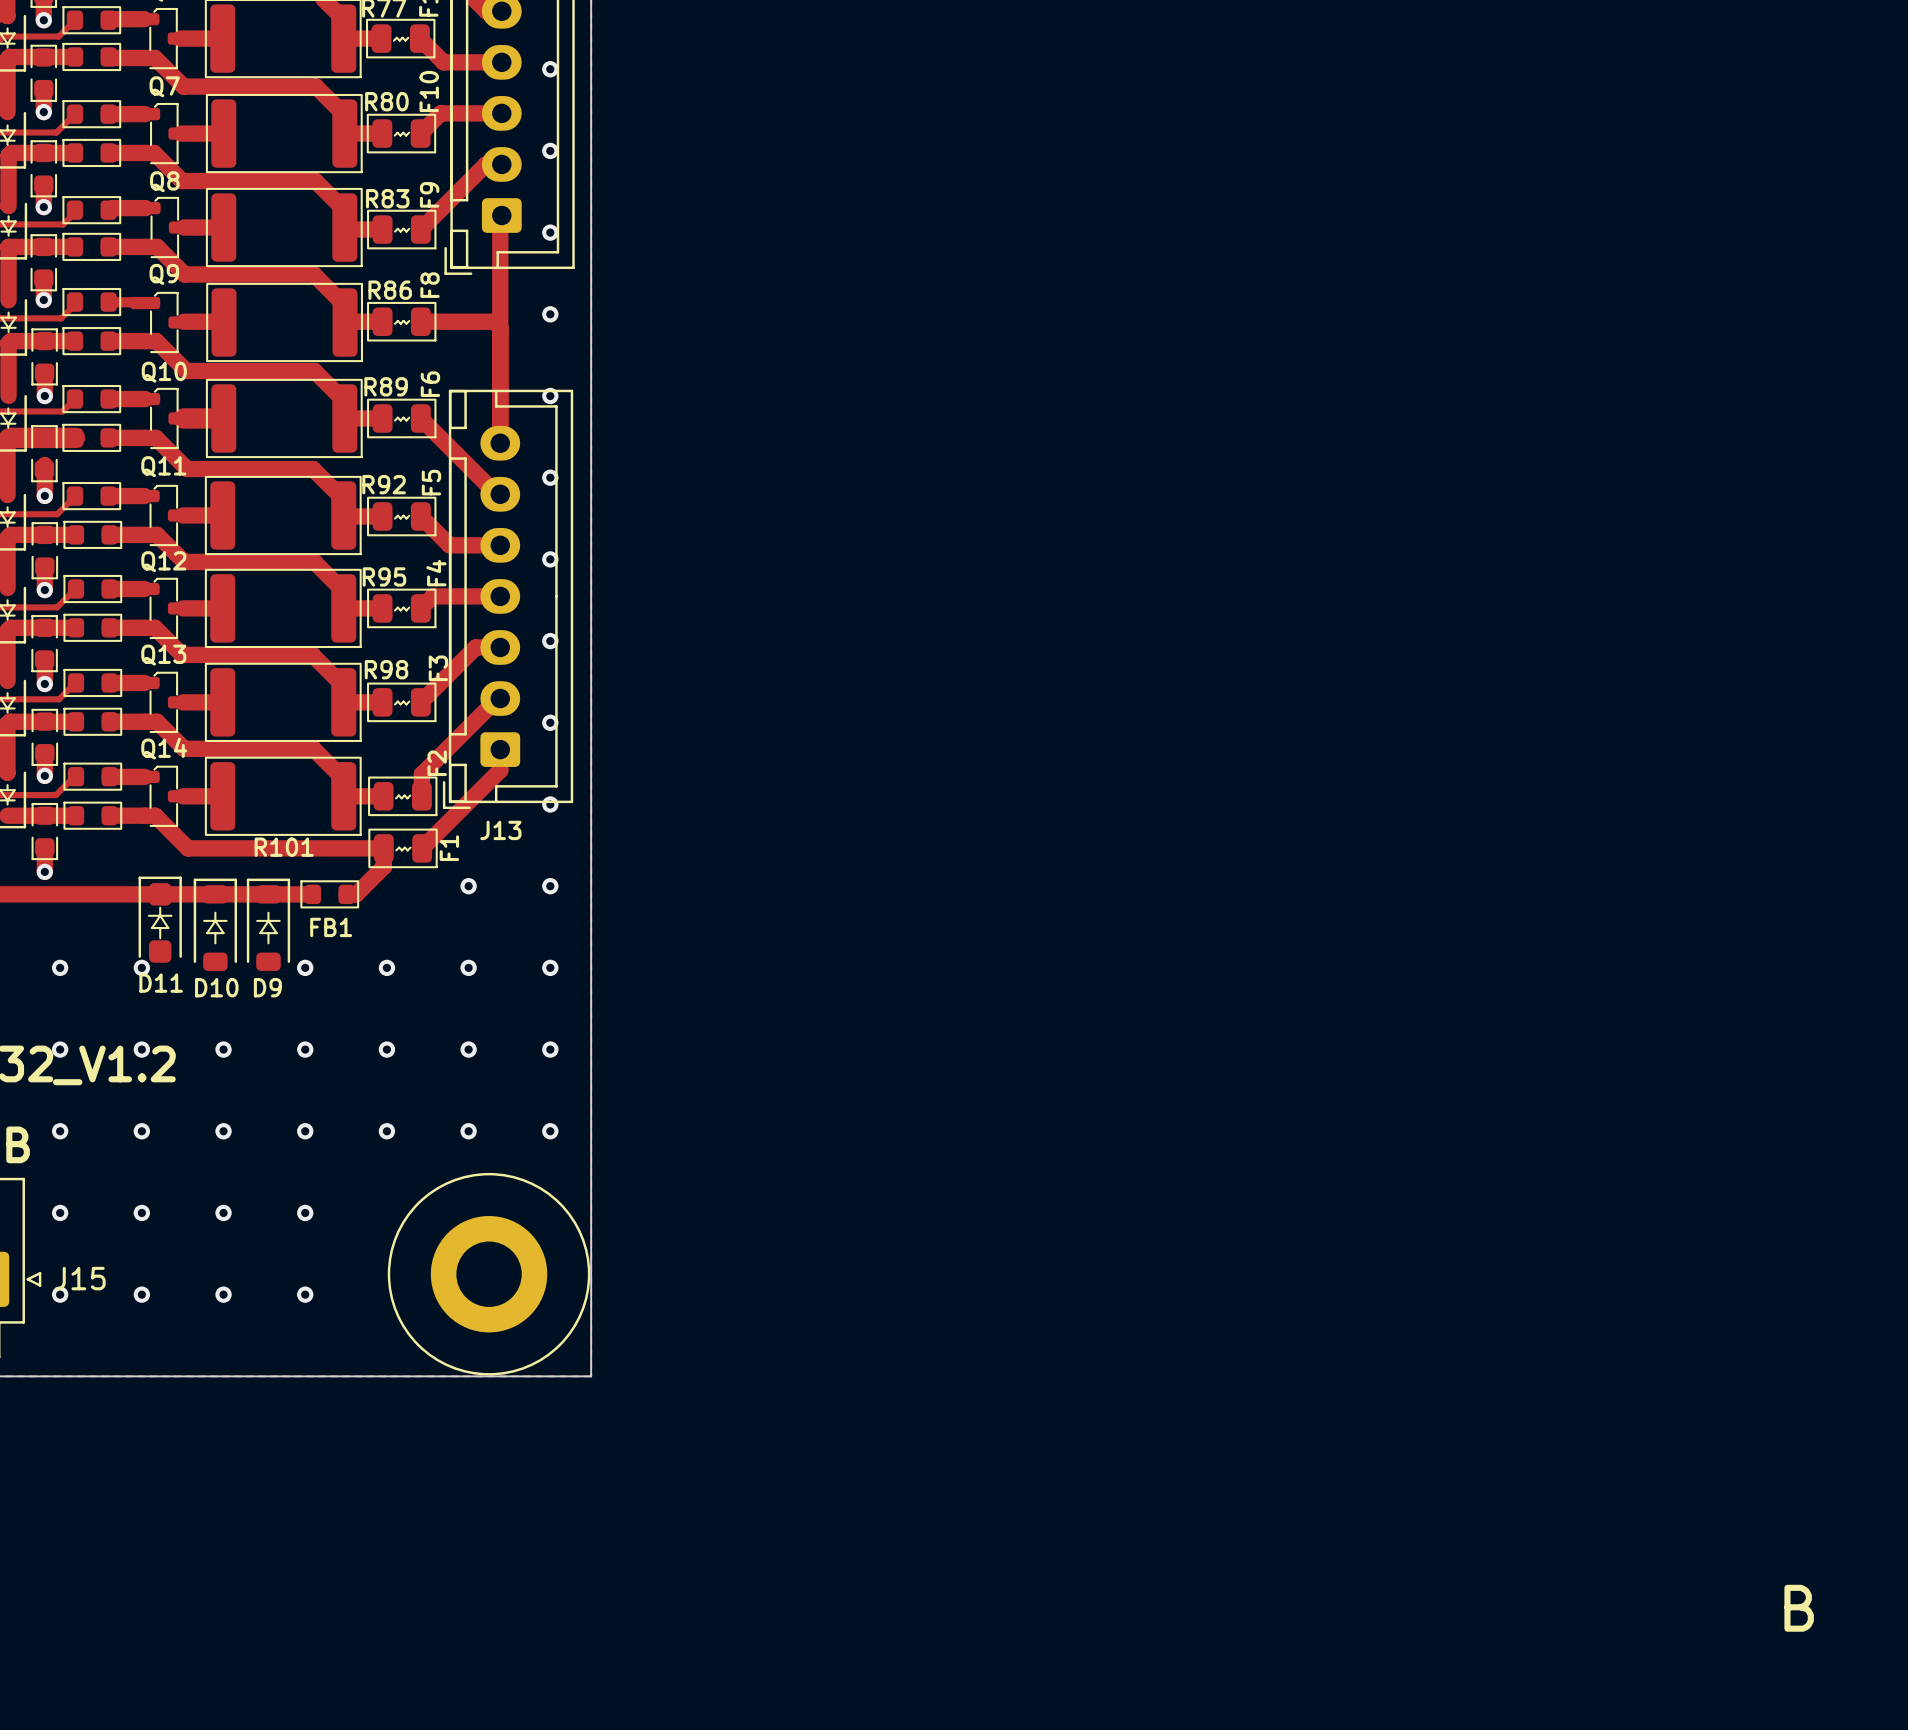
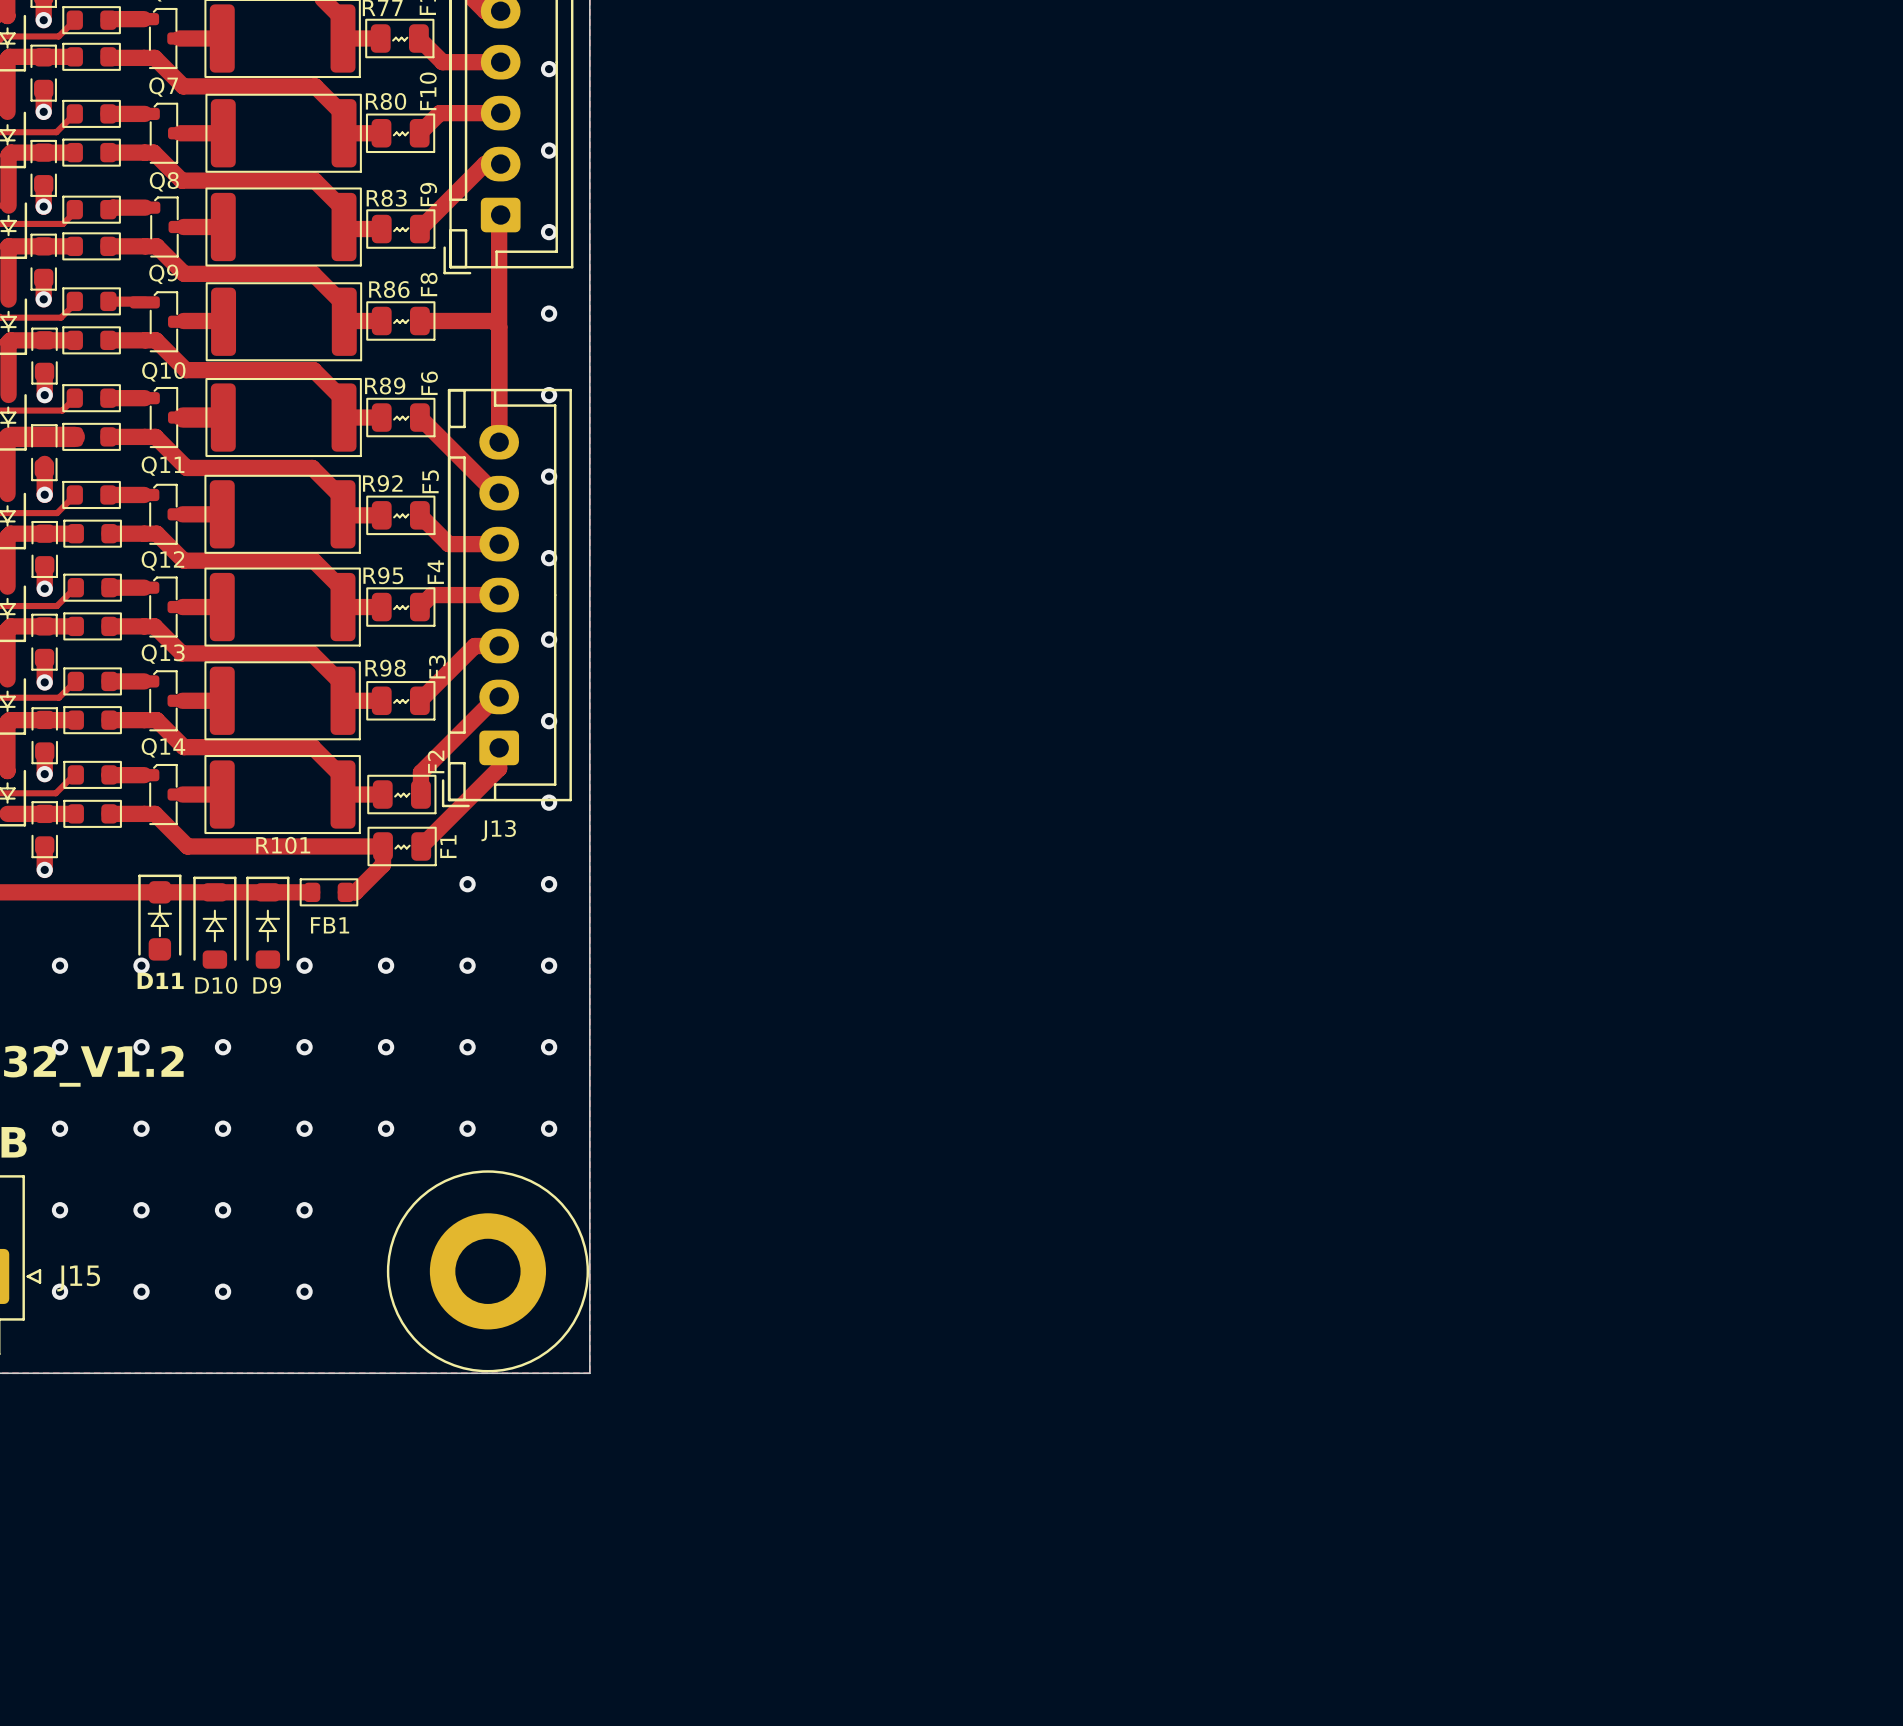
text: B (1799, 1608) -> none

